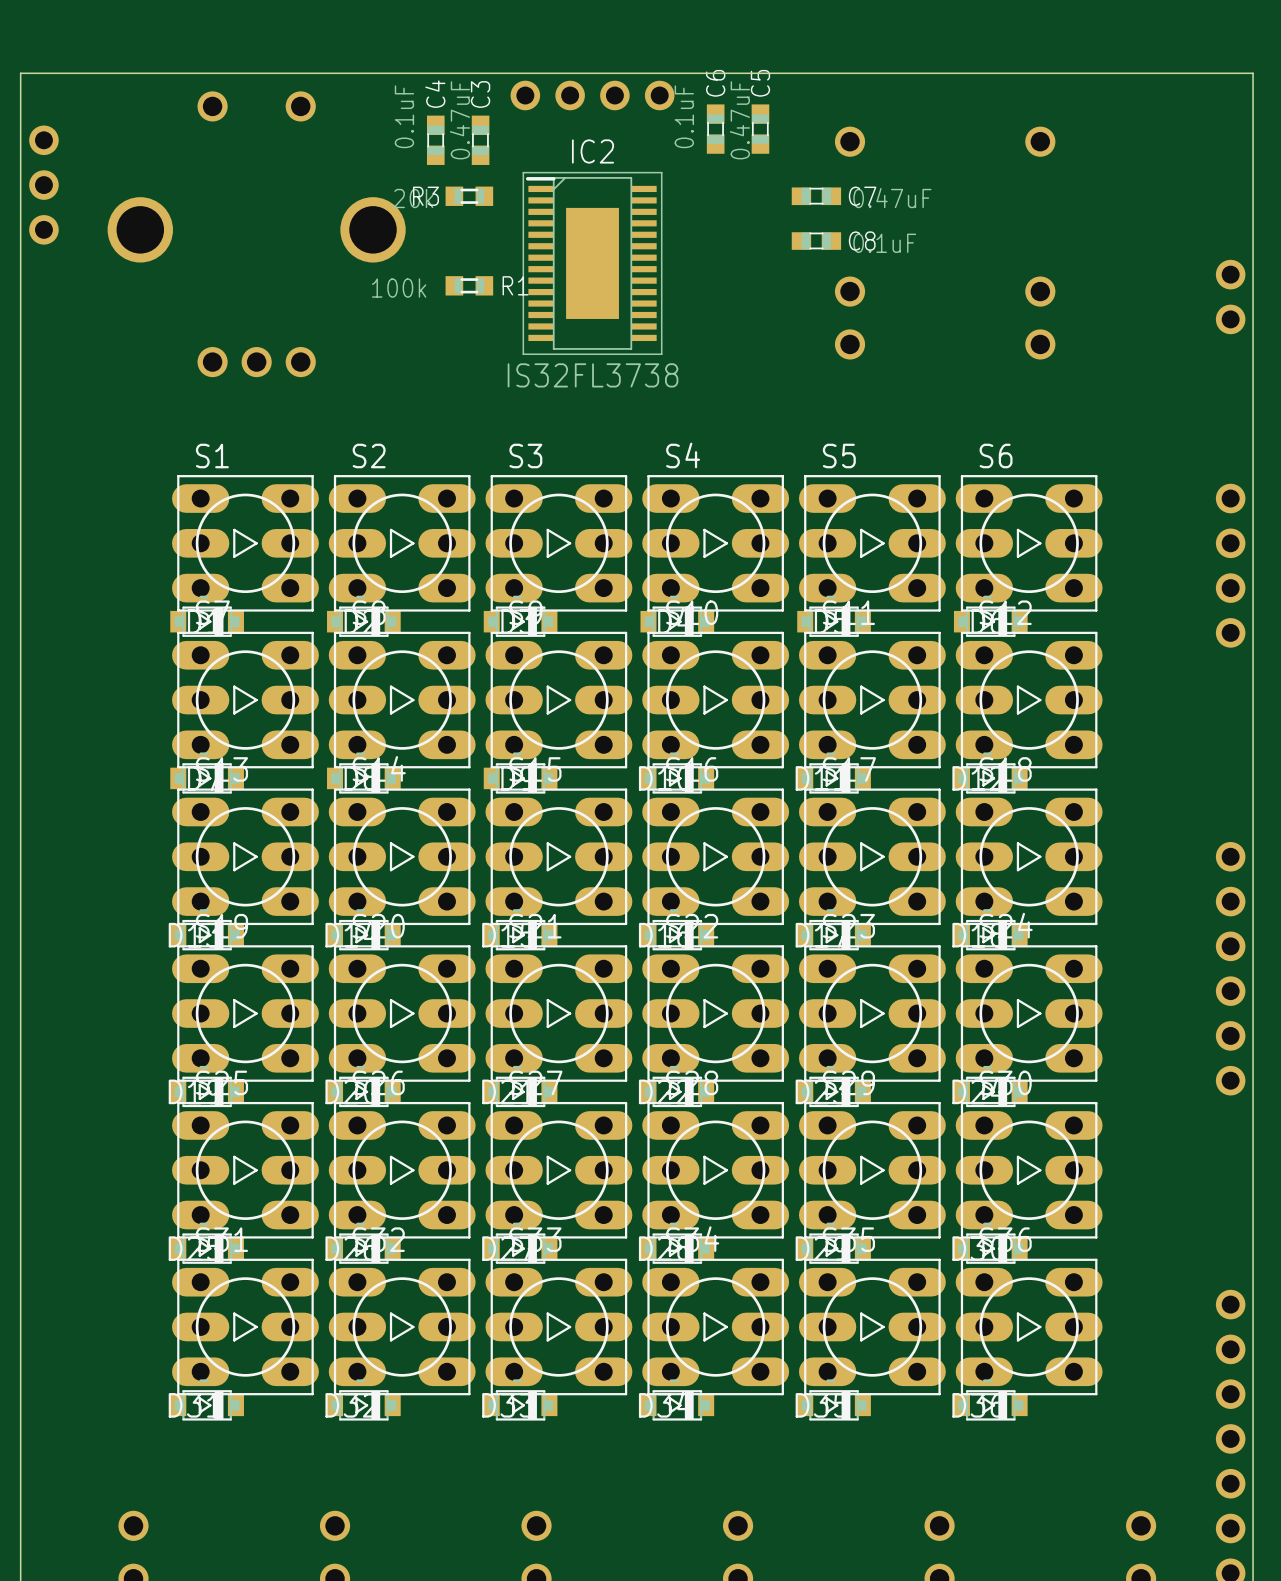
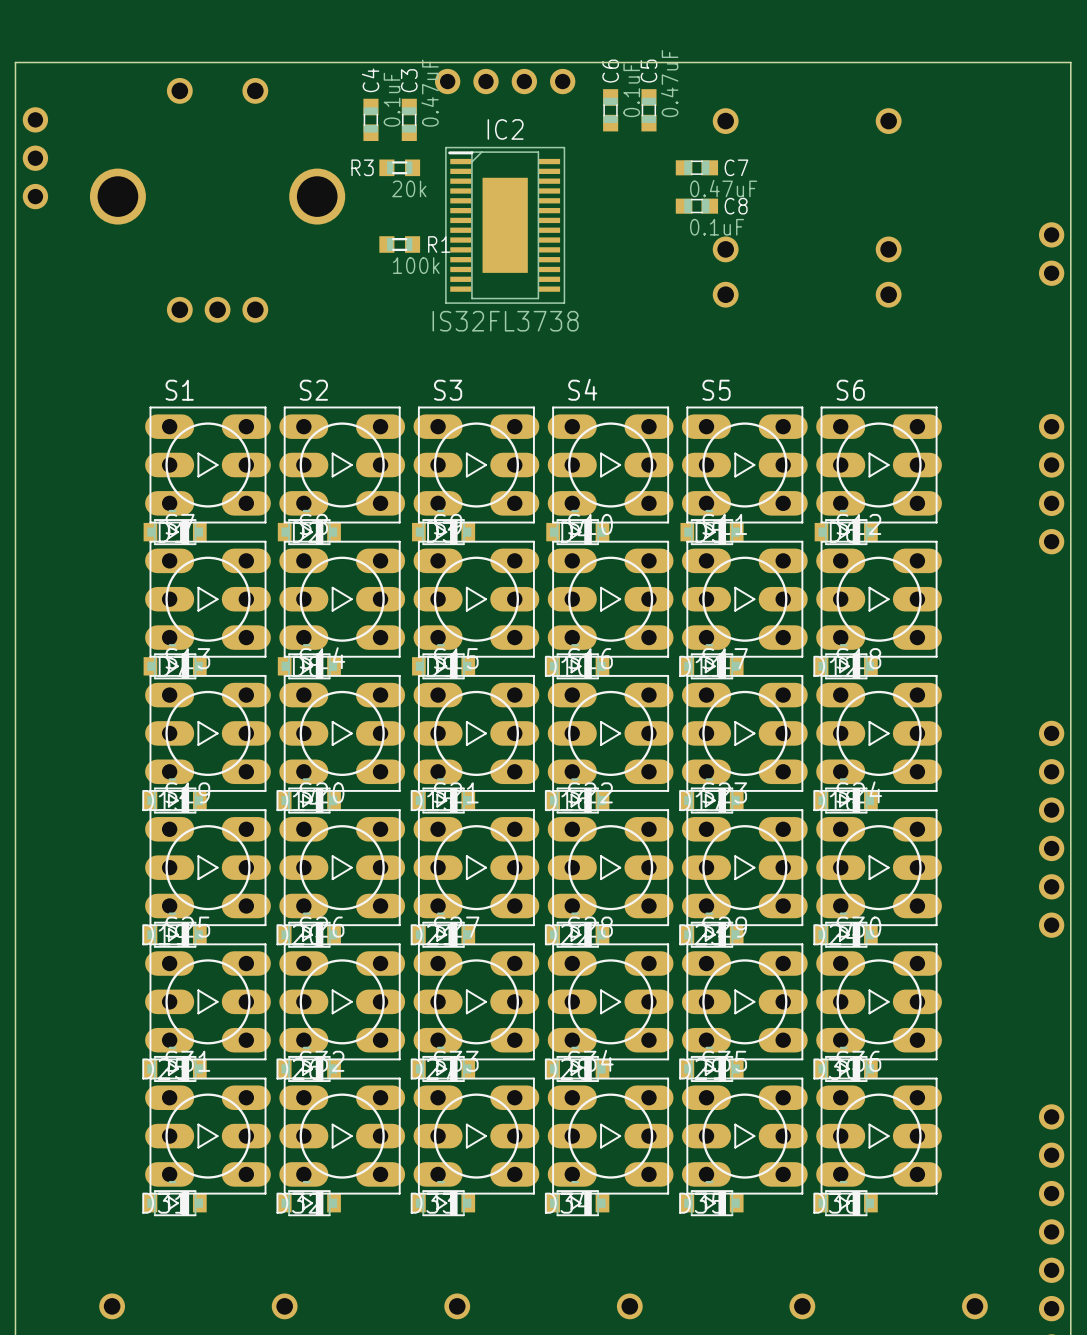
C4 value position: 0.1uF (404, 116) -> 0.1uF (392, 99)
C6 value position: 0.1uF (684, 116) -> 0.1uF (631, 90)
C3 value position: 0.47uF (459, 120) -> 0.47uF (430, 93)
C5 value position: 0.47uF (739, 120) -> 0.47uF (669, 83)
R3 value position: 20k (413, 198) -> 20k (409, 188)
C7 value position: 0.47uF (892, 198) -> 0.47uF (723, 188)
C8 value position: 0.1uF (884, 243) -> 0.1uF (717, 227)
R1 value position: 100k (399, 288) -> 100k (416, 265)

